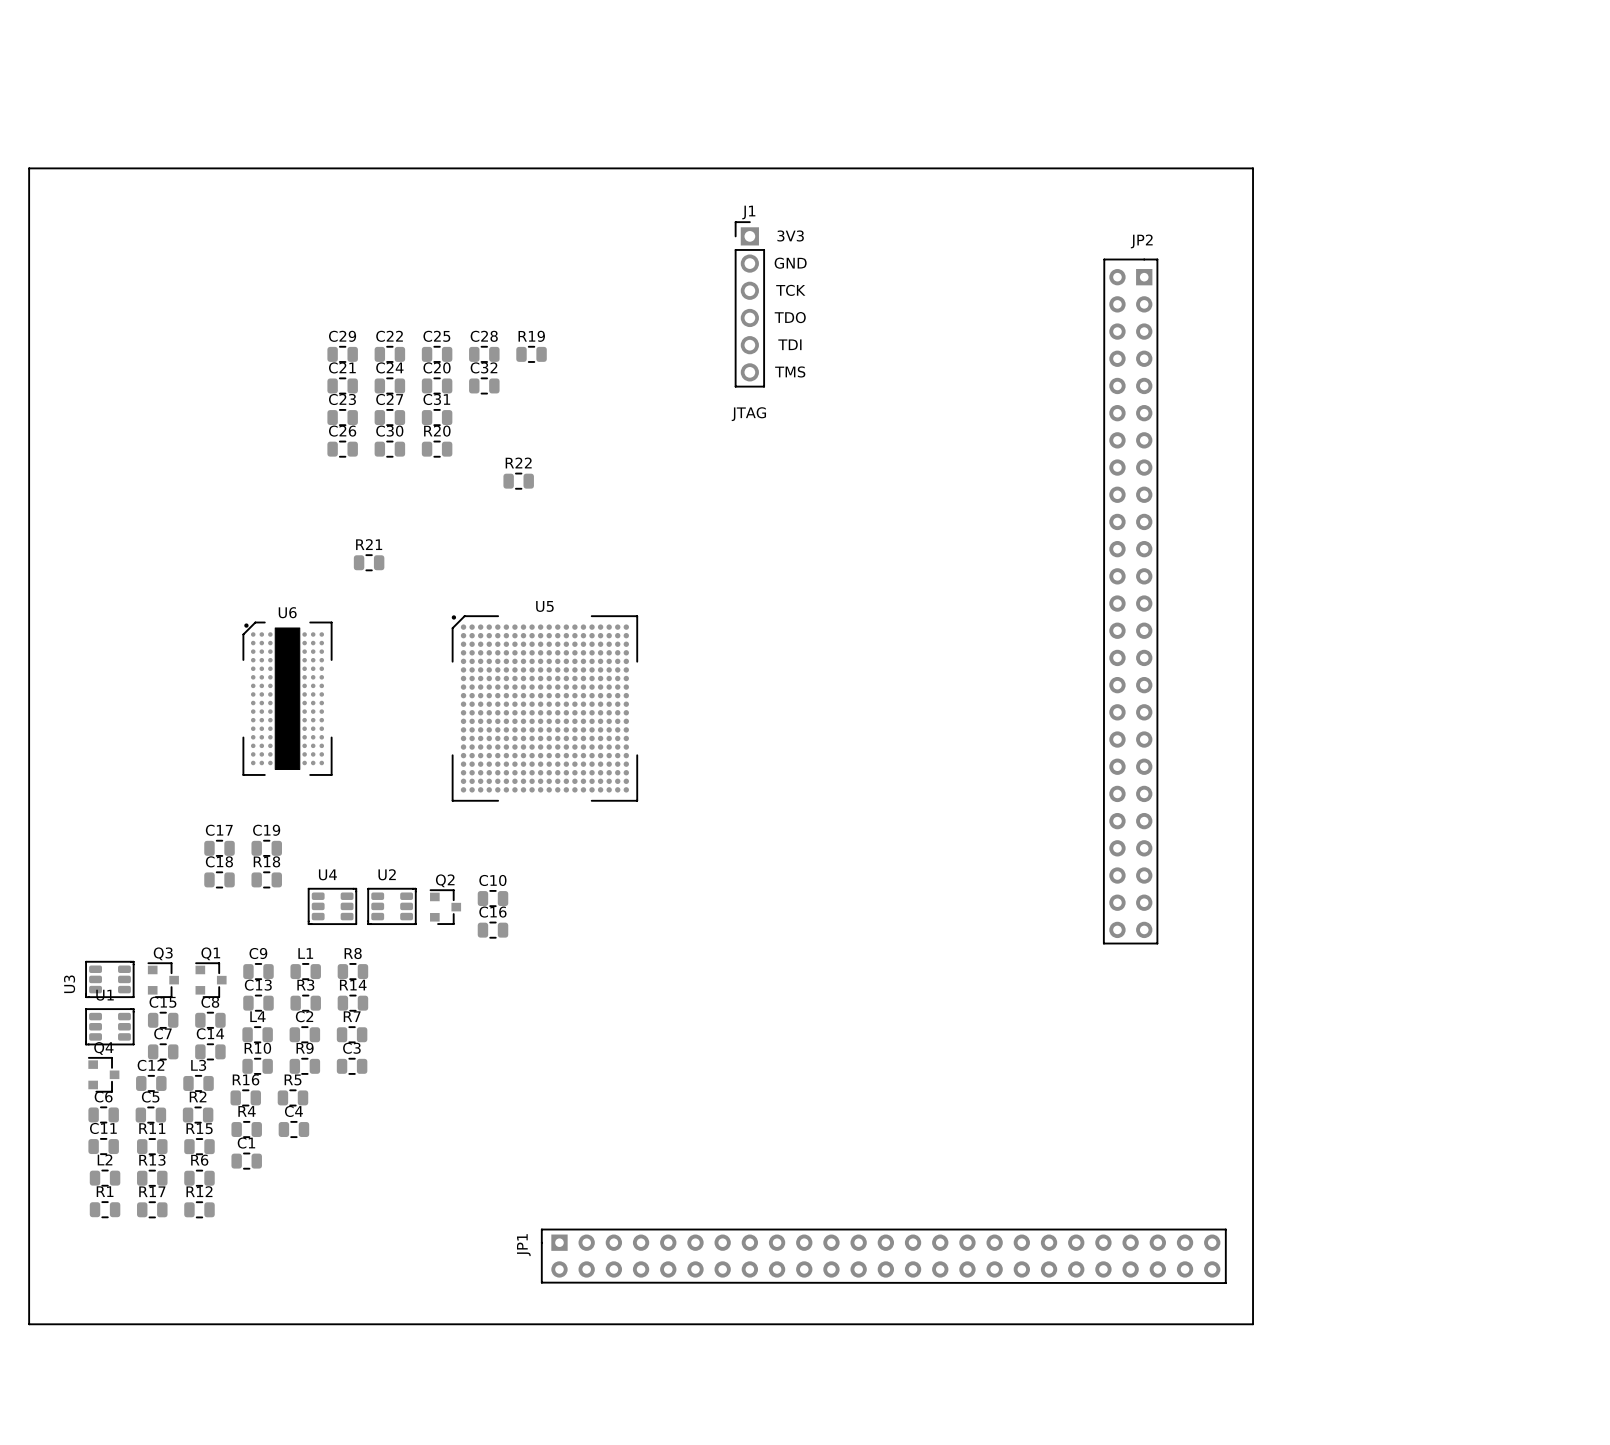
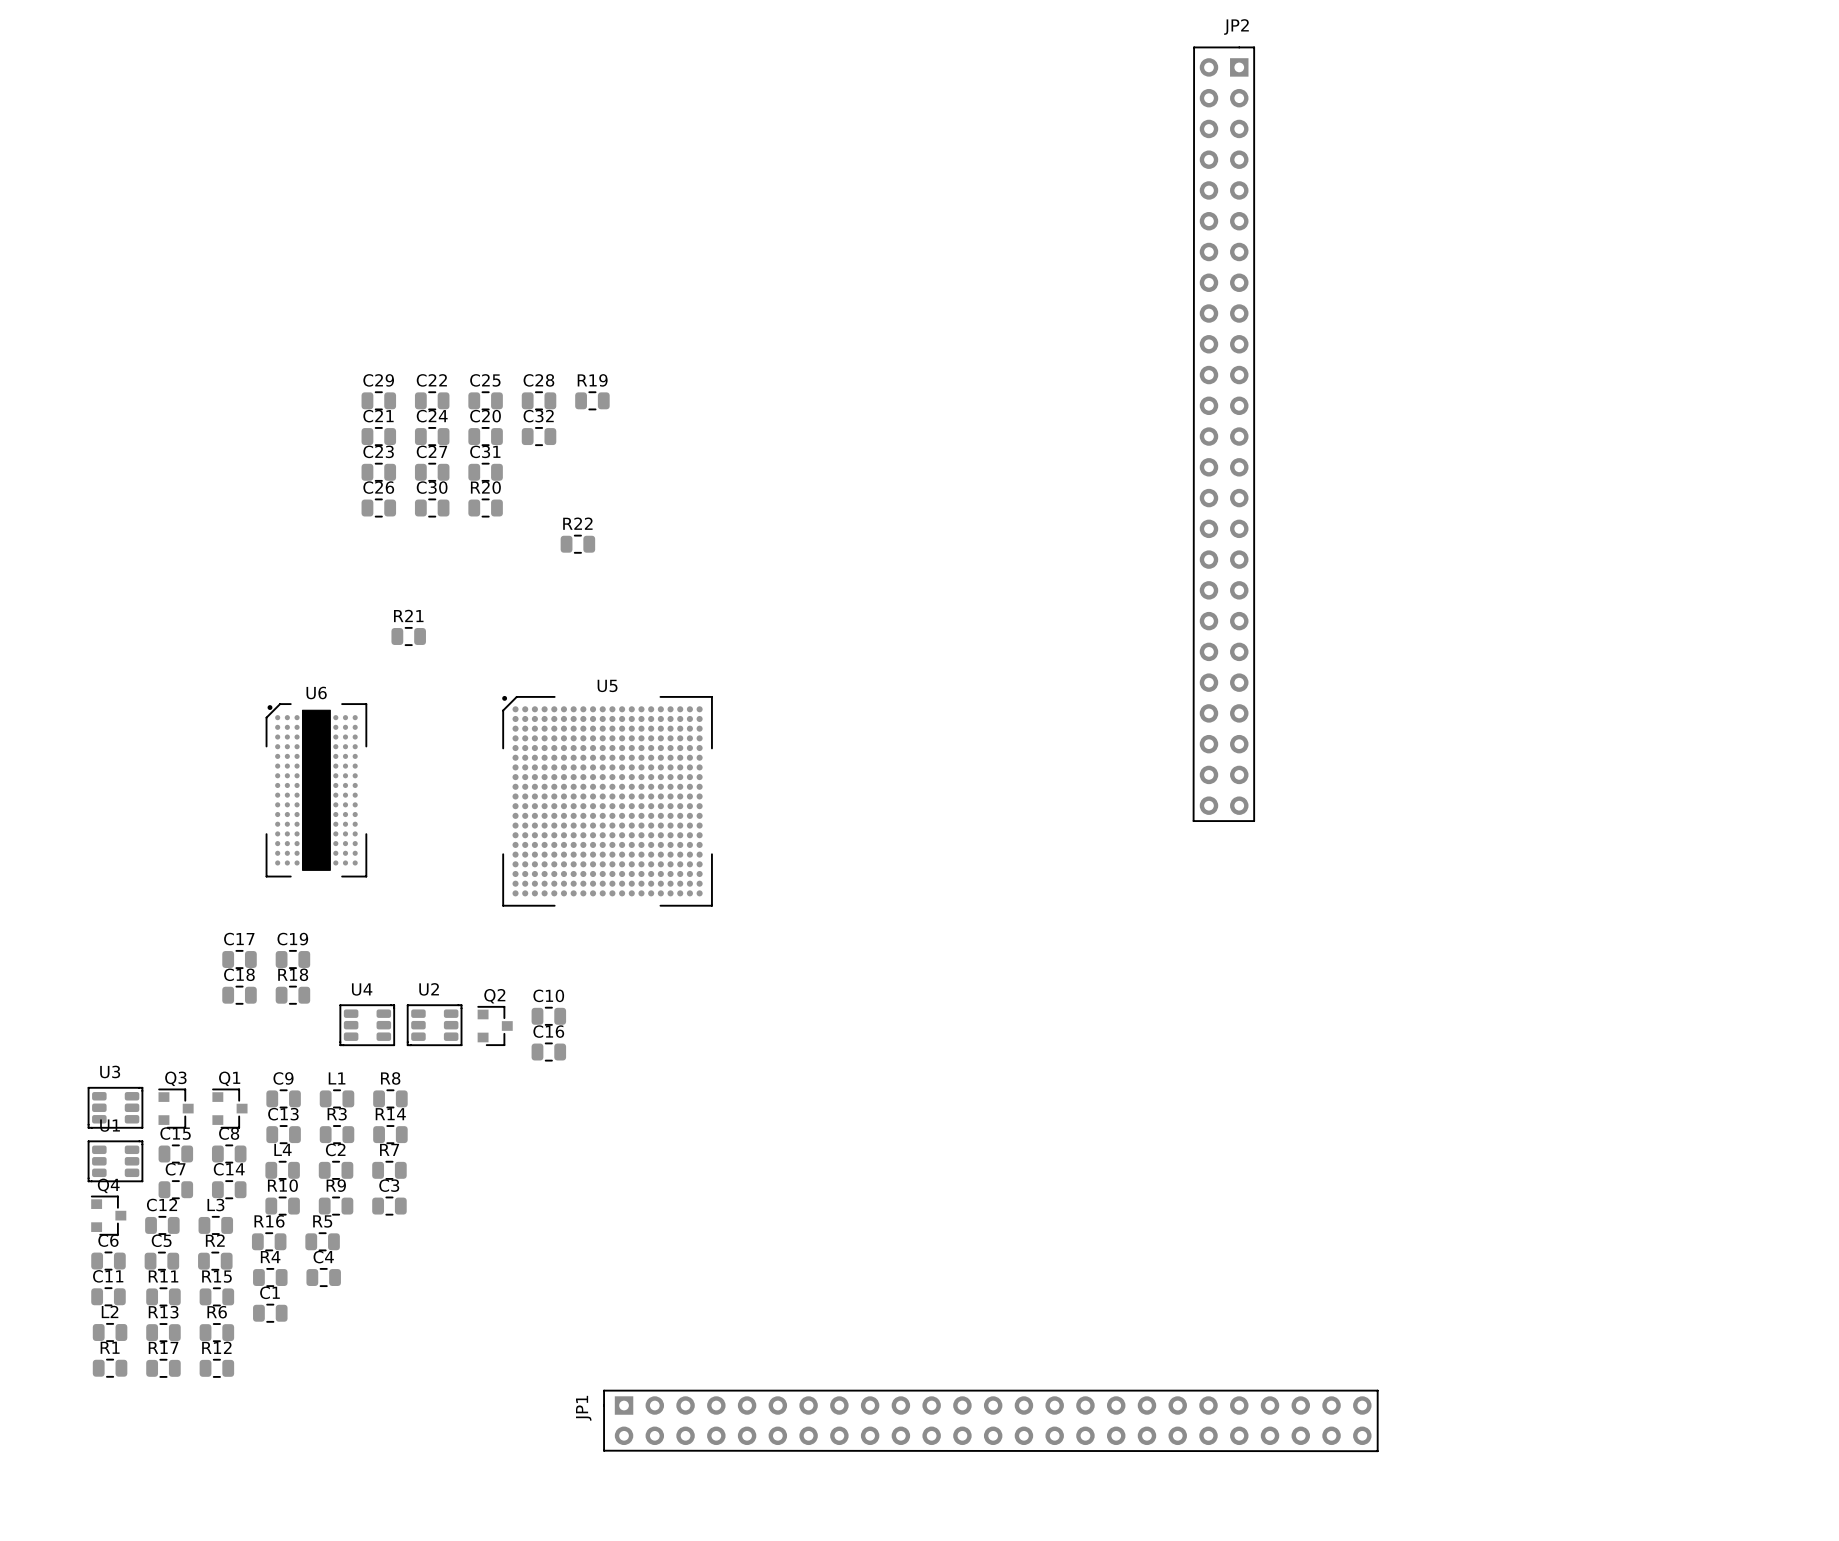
board edge: (29, 168) (1253, 168) (1253, 1324) (29, 1324) (29, 168) -> none
text: 3V3 (790, 235) -> none
text: GND (790, 263) -> none
text: TCK (790, 290) -> none
J1: (749, 304) -> none
text: TDO (790, 317) -> none
text: TDI (789, 344) -> none
text: TMS (790, 371) -> none
text: JTAG (748, 414) -> none
JP2 position: (1130, 601) -> (1223, 434)
U3 name rotation: 0° (69, 984) -> 90° clockwise (110, 1071)
U3 name position: U3 (69, 984) -> U3 (110, 1071)

